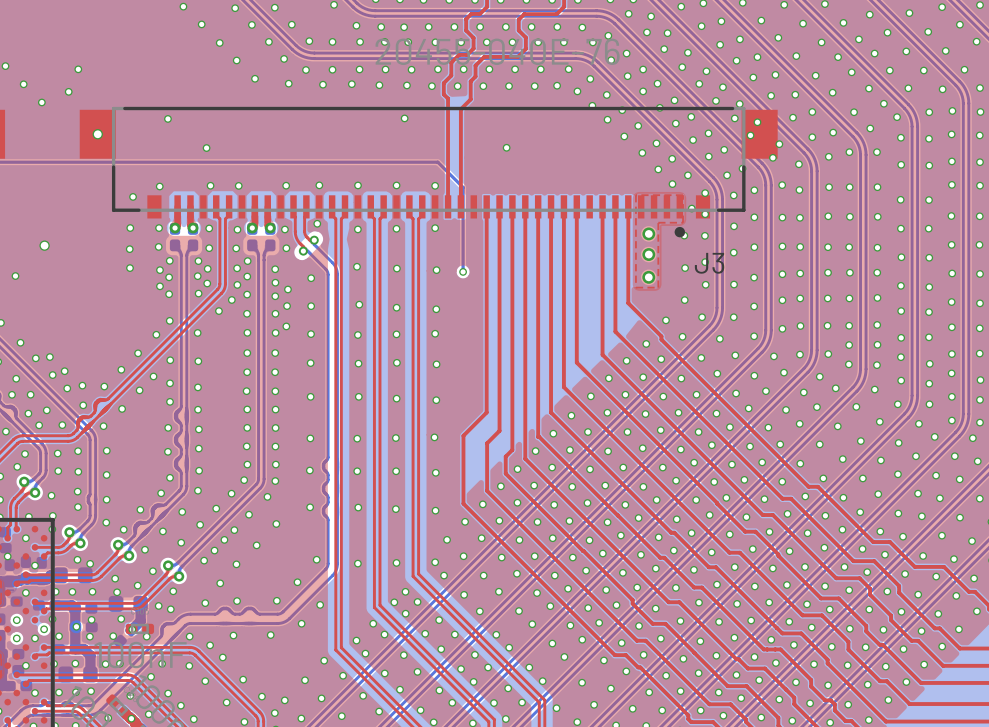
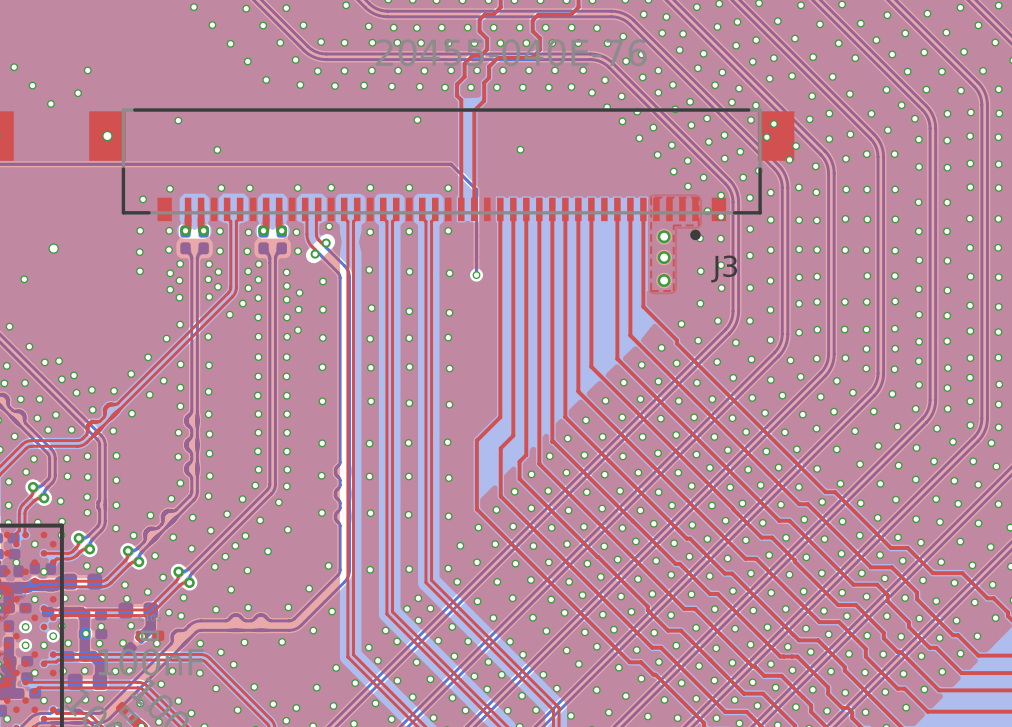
via: (851, 72) -> none
via: (771, 95) -> none
via: (828, 272) -> none

